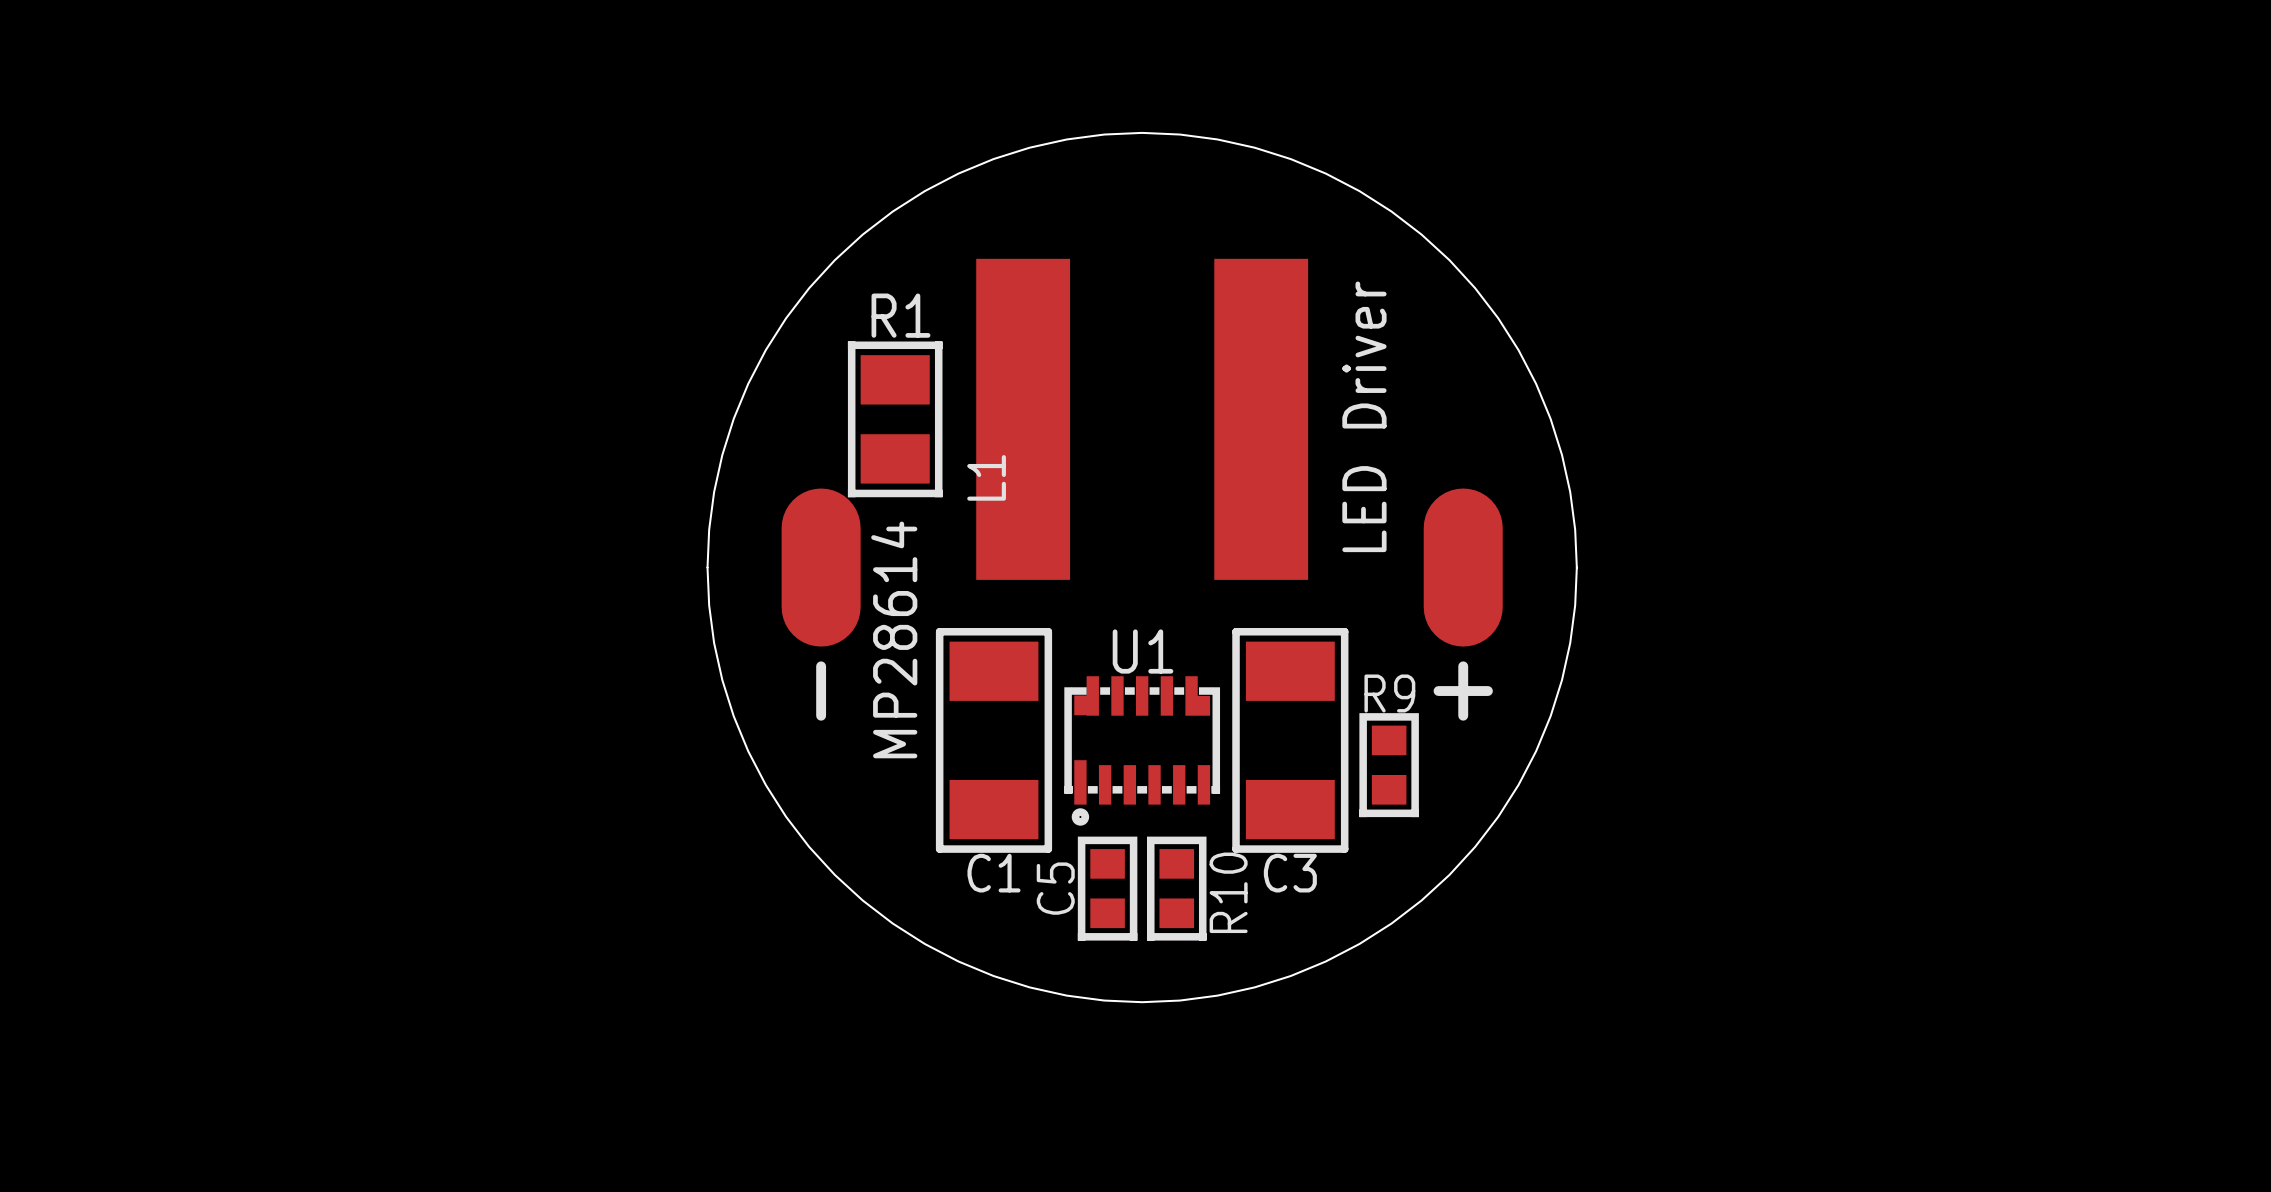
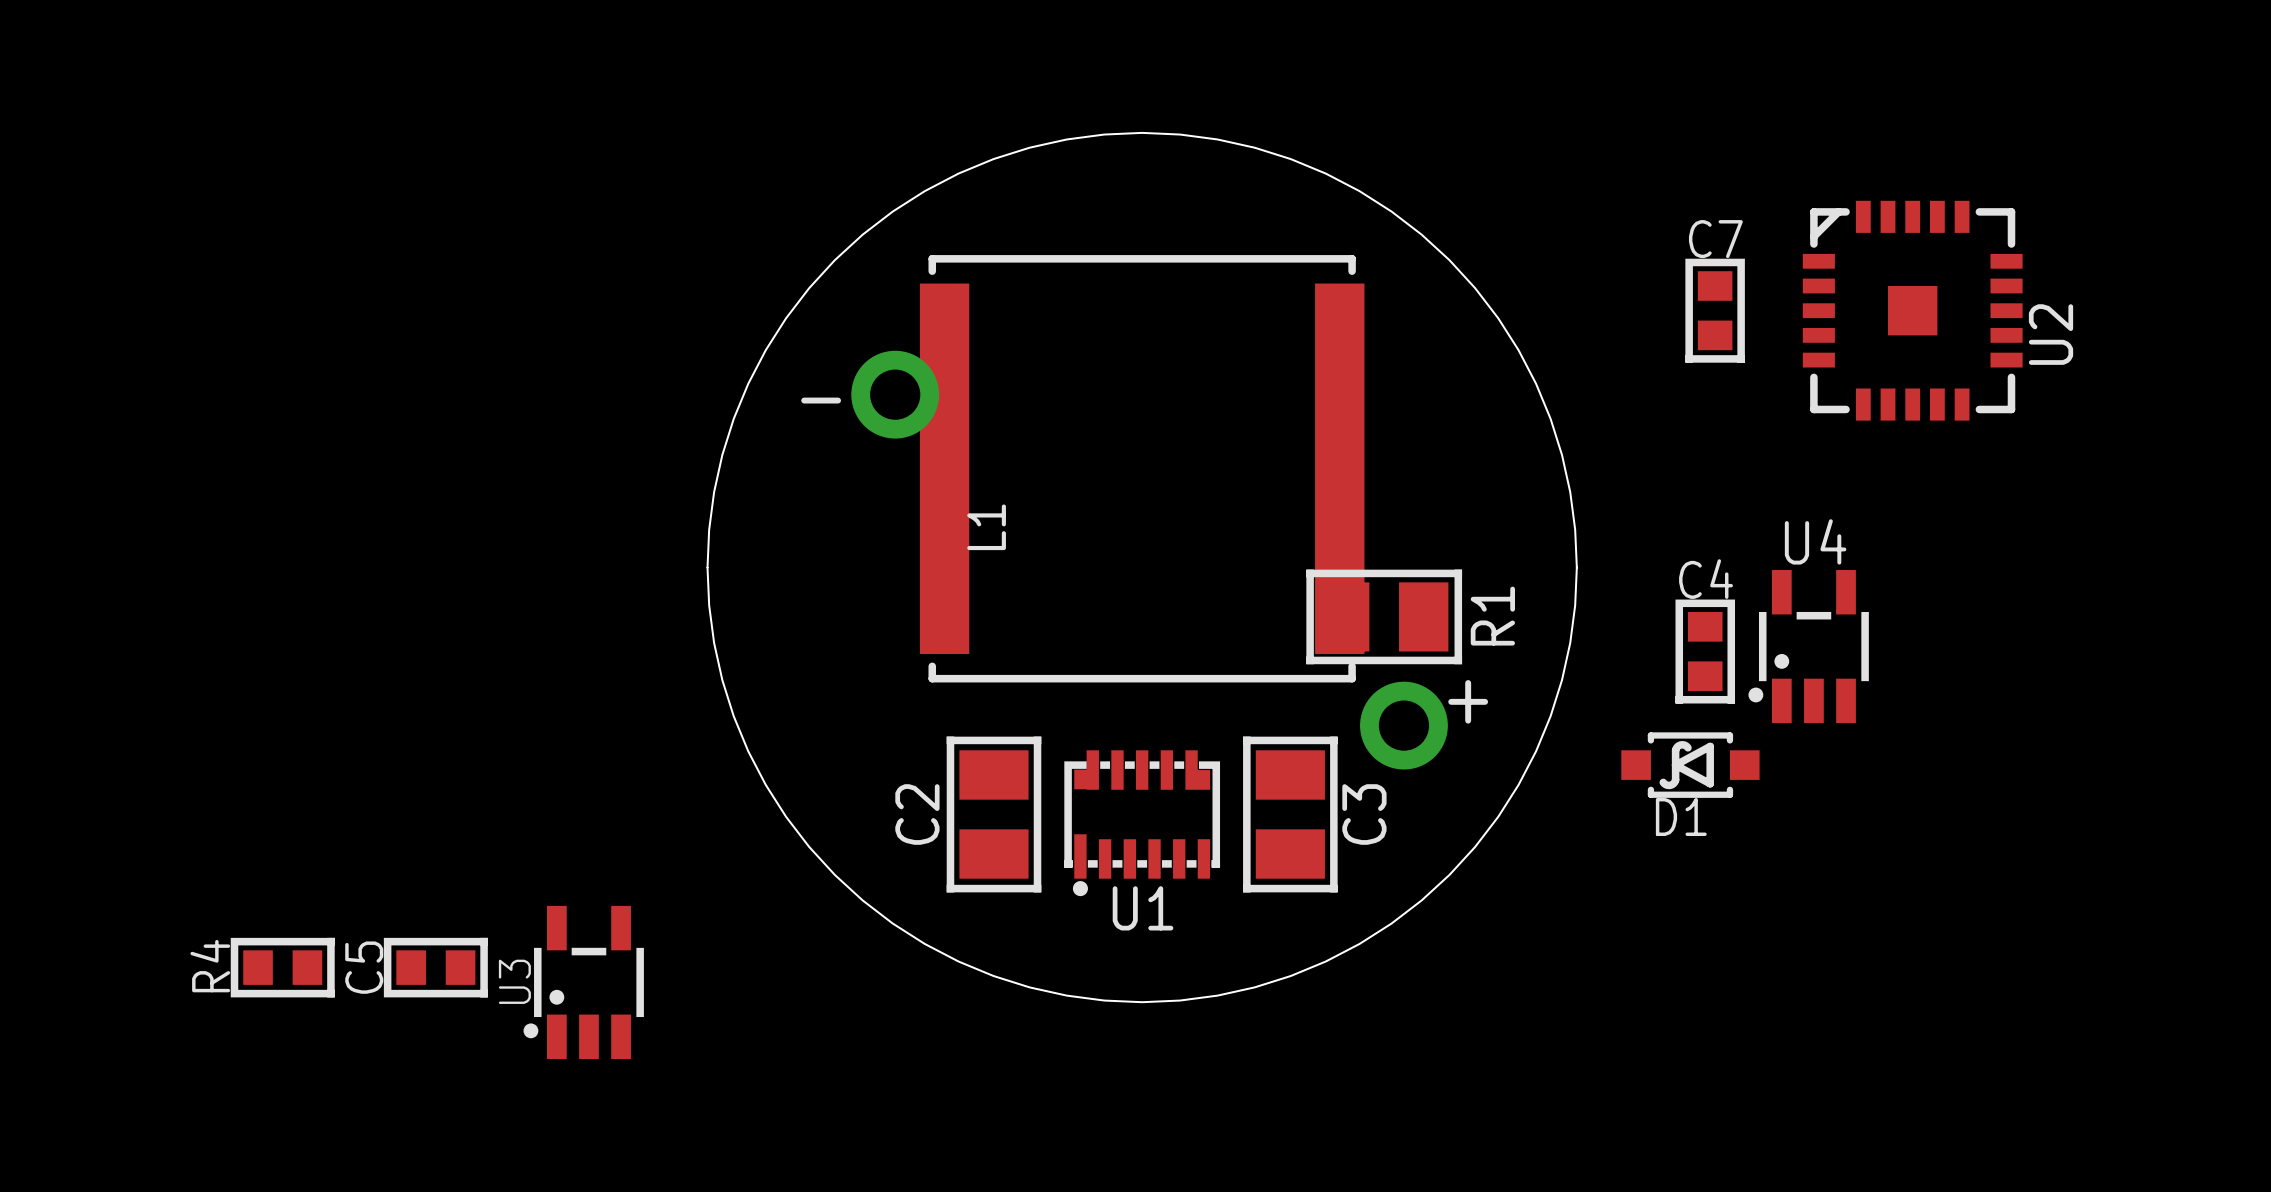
L1 footprint: [976, 258, 1309, 580] -> [919, 255, 1365, 683]
C7: none -> (1715, 310)
U2: none -> (1912, 310)
part: none -> (895, 394)
text: LED Driver (1364, 416) -> none
R1 rotation: 0° (895, 419) -> 90° clockwise (1384, 616)
R1 position: (895, 419) -> (1384, 616)
part: (821, 567) -> none
part: (1463, 567) -> none
C3 footprint: [1232, 627, 1349, 853] -> [1243, 736, 1338, 893]
text: MP28614 (894, 639) -> none
U4: none -> (1808, 646)
U1 name position: U1 (1143, 651) -> U1 (1143, 908)
C4: none -> (1705, 651)
line: (821, 666) (821, 715) -> none
line: (1463, 666) (1463, 715) -> none
U1 footprint: [1064, 676, 1221, 826] -> [1064, 750, 1221, 897]
line: (1438, 691) (1487, 691) -> none
part: none -> (1403, 725)
C1: (993, 740) -> none
R9: (1389, 765) -> none
D1: none -> (1690, 765)
C2: none -> (993, 814)
C3 name position: C3 (1290, 873) -> C3 (1364, 814)
C5 rotation: 0° (1107, 888) -> 90° counterclockwise (435, 967)
C5 position: (1107, 888) -> (435, 967)
R10: (1176, 888) -> none
R4: none -> (282, 967)
U3: none -> (583, 982)

